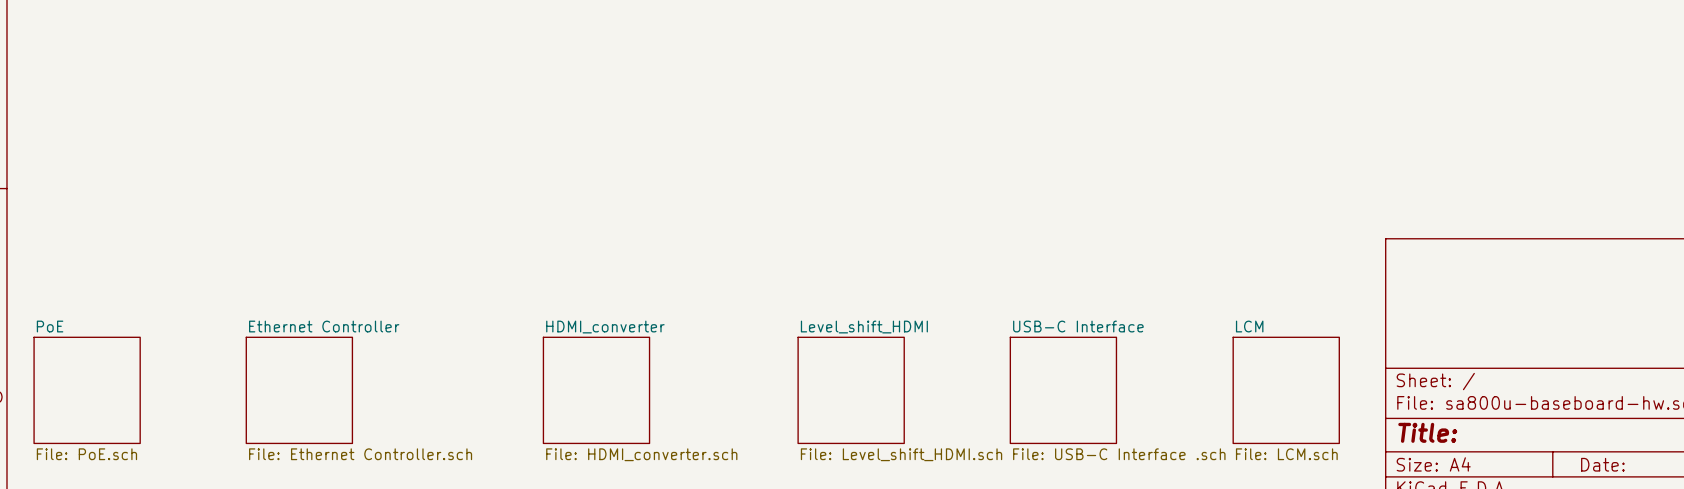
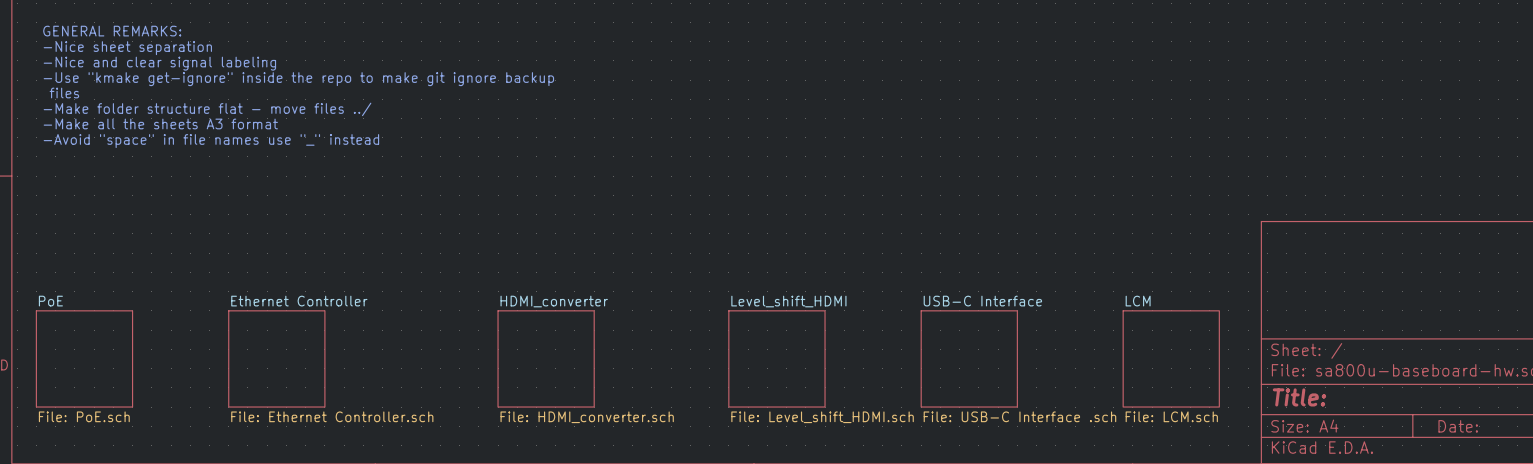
text: none -> GENERAL REMARKS: (112, 31)
text: none -> -Nice sheet separation (127, 48)
text: none -> -Nice and clear signal labeling (159, 63)
text: none -> -Use "kmake get-ignore" inside the repo to make git ignore backup (298, 79)
text: none -> files (64, 93)
text: none -> -Make folder structure flat - move files ../ (207, 109)
text: none -> -Make all the sheets A3 format (160, 123)
text: none -> -Avoid "space" in file names use "_" instead (211, 141)

